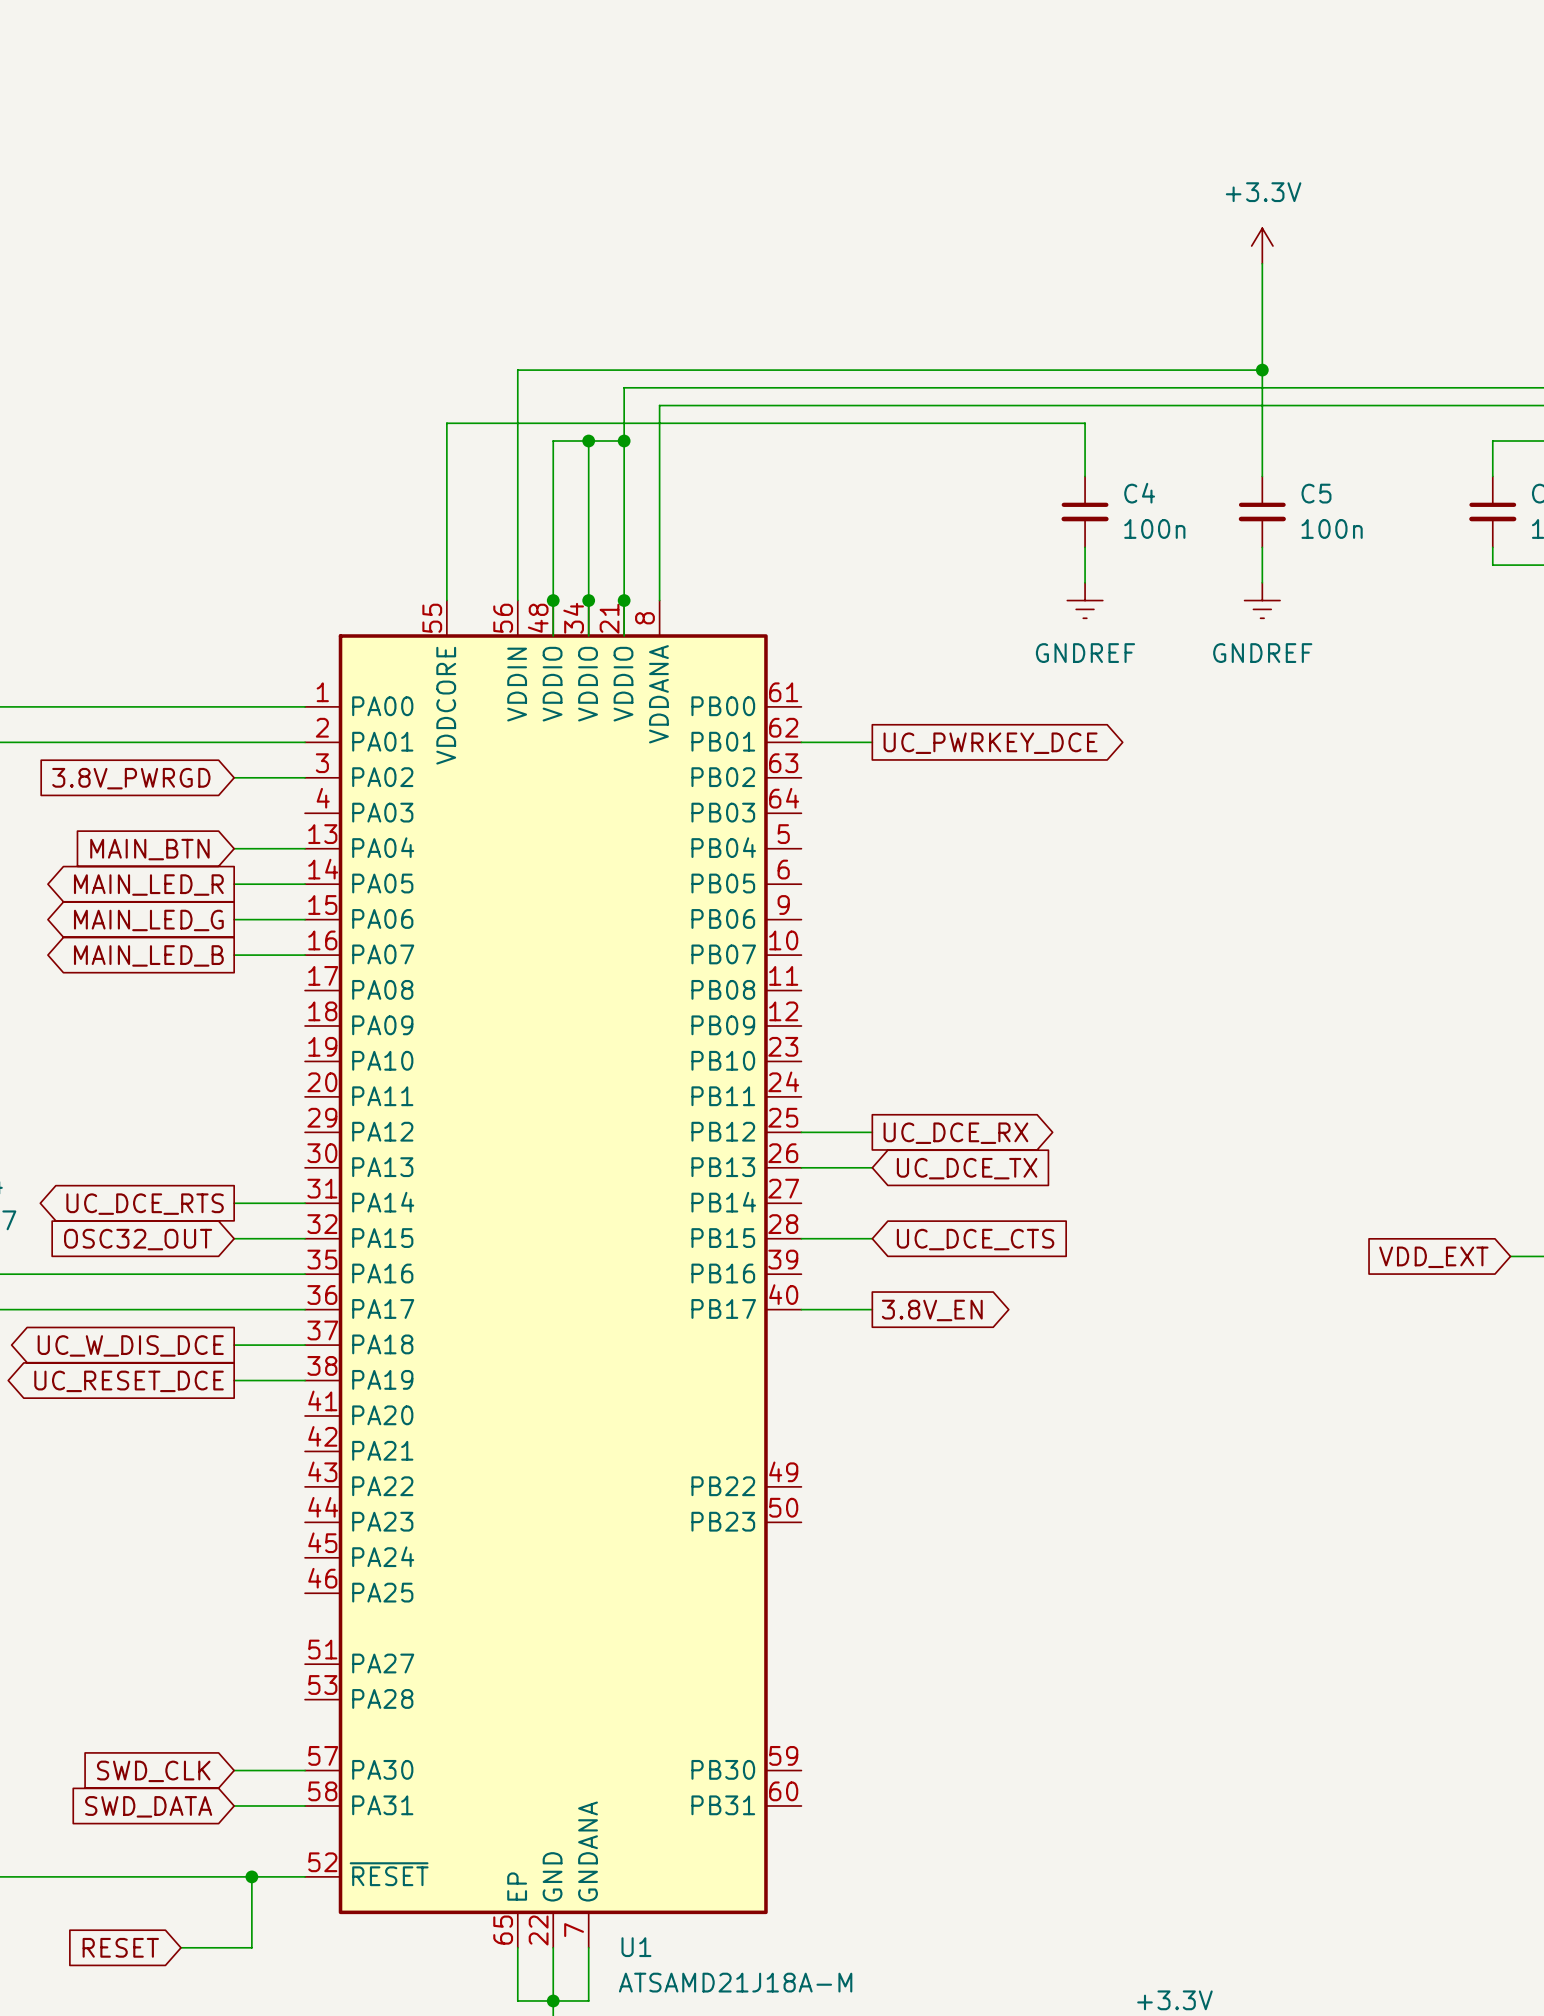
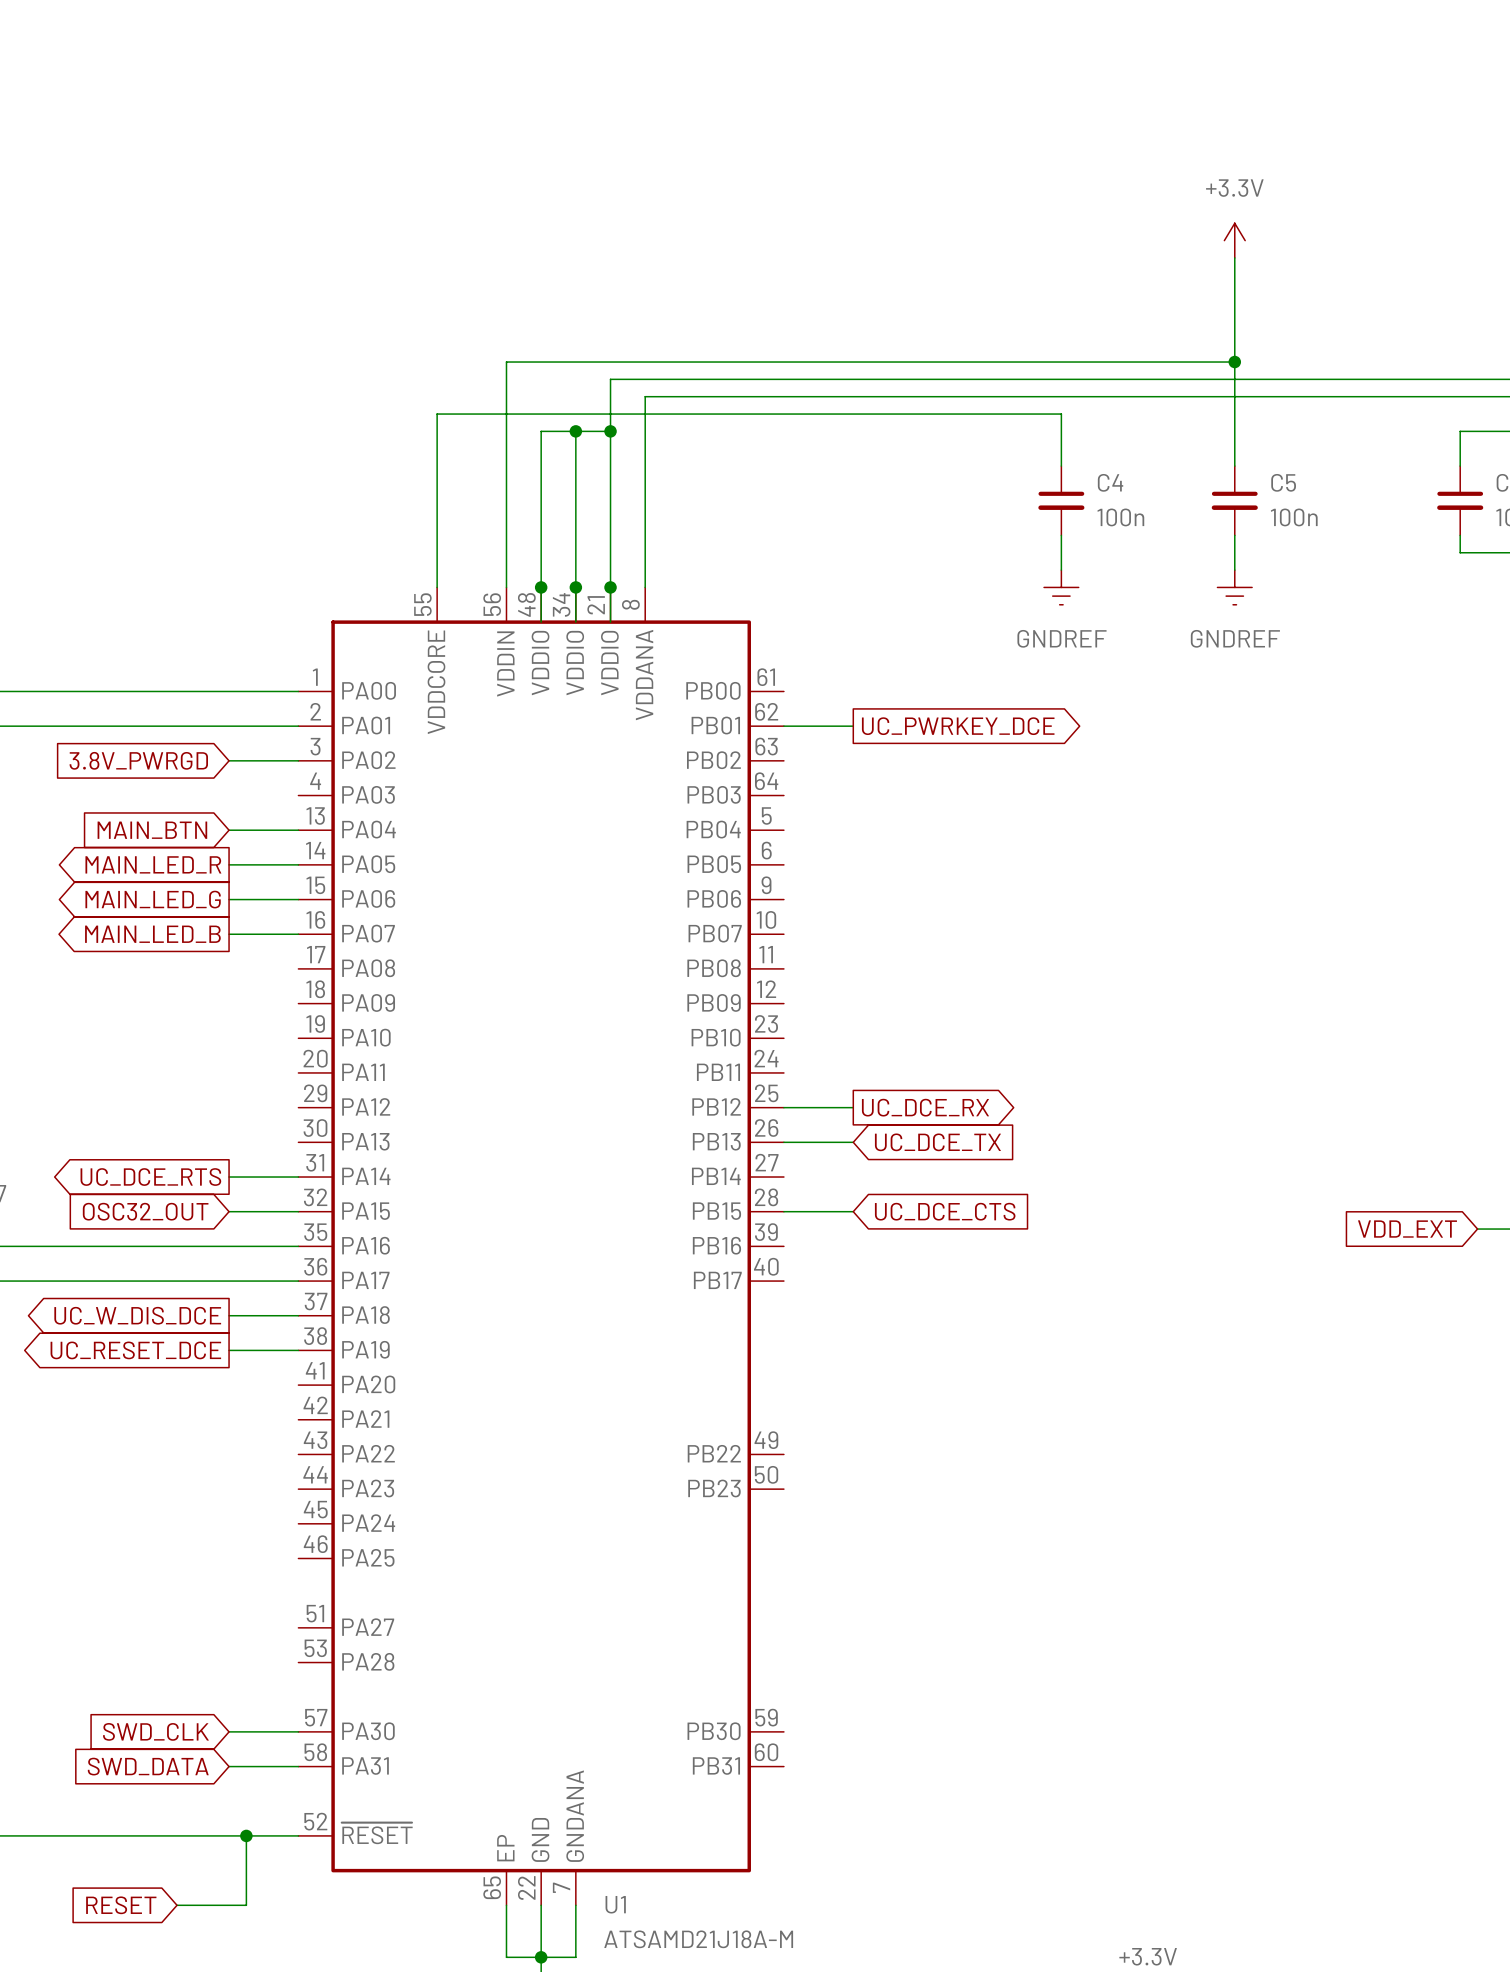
wire: (801, 1309) (872, 1309) -> none
global label: 3.8V_EN (932, 1310) -> none

